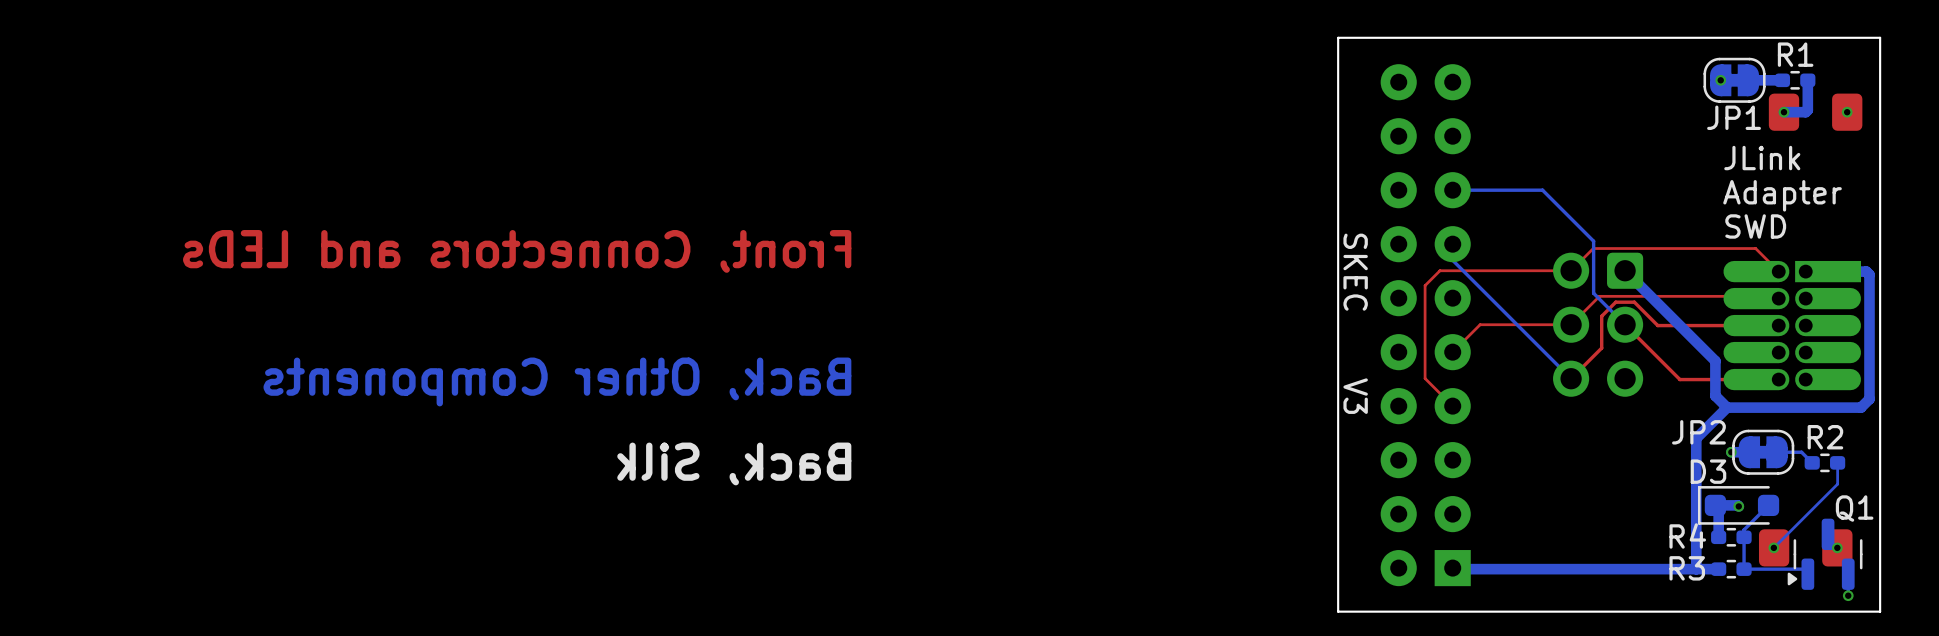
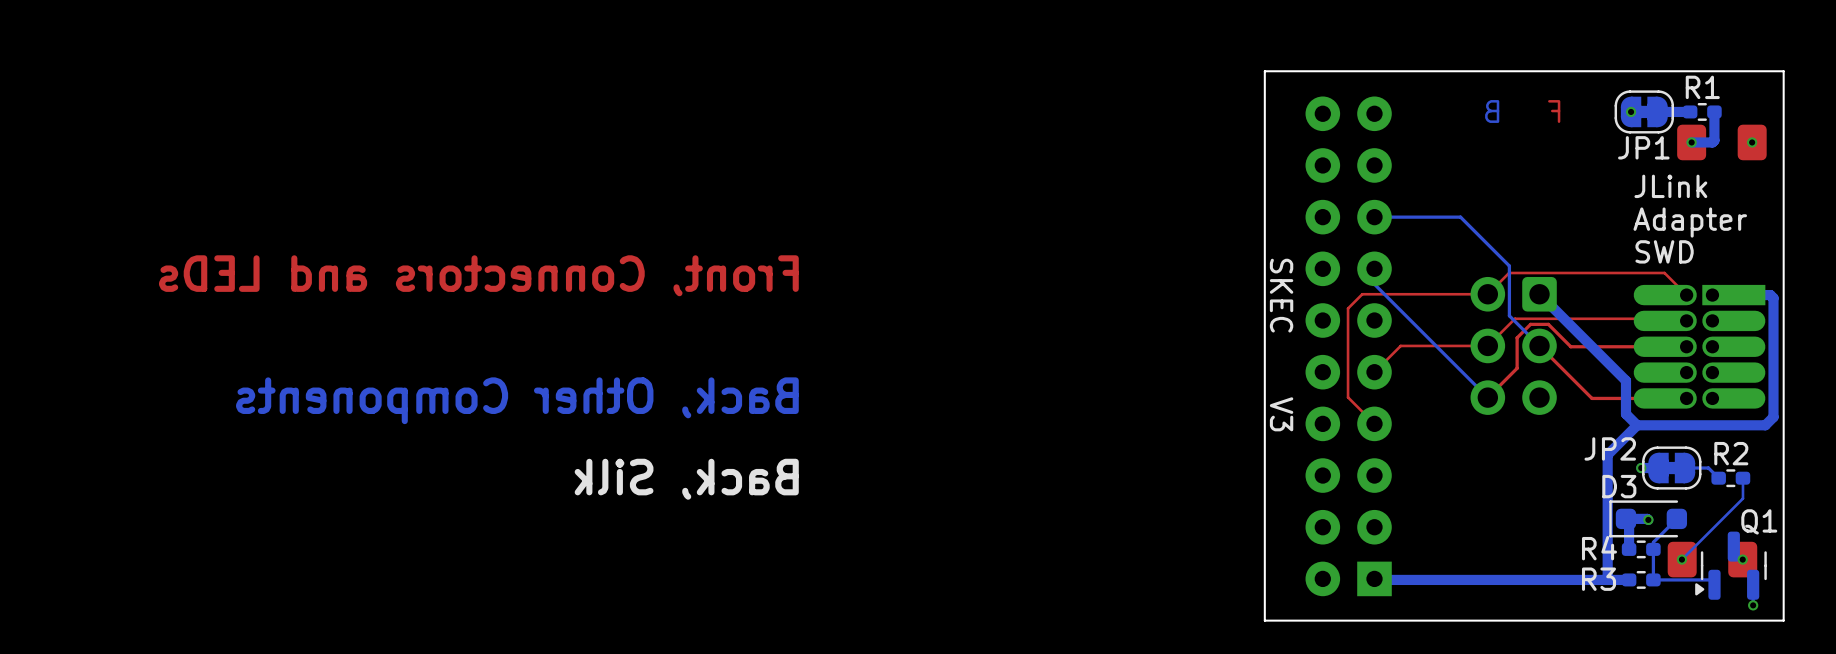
drawing: none -> [1485, 100, 1561, 123]

